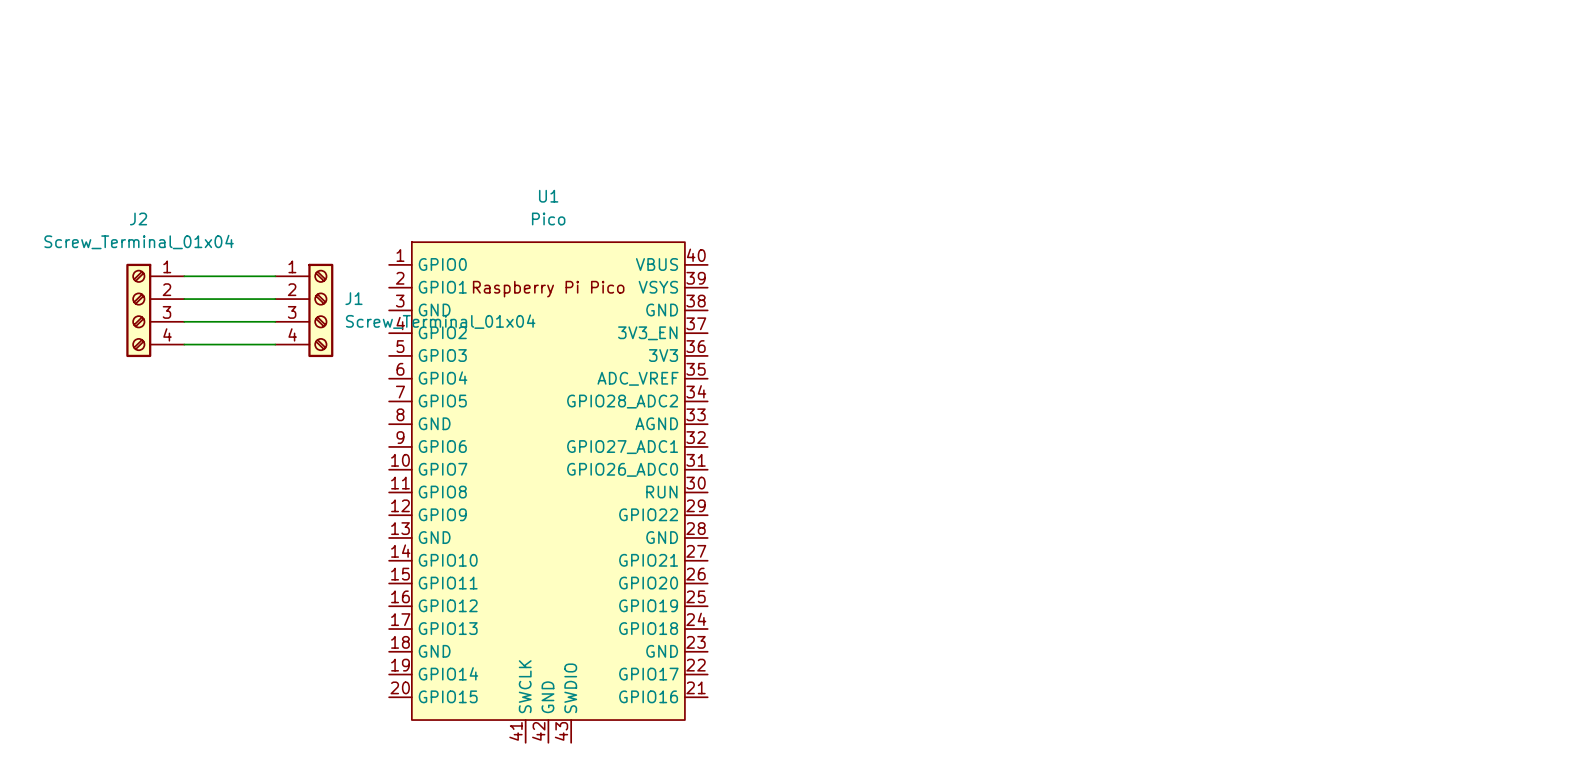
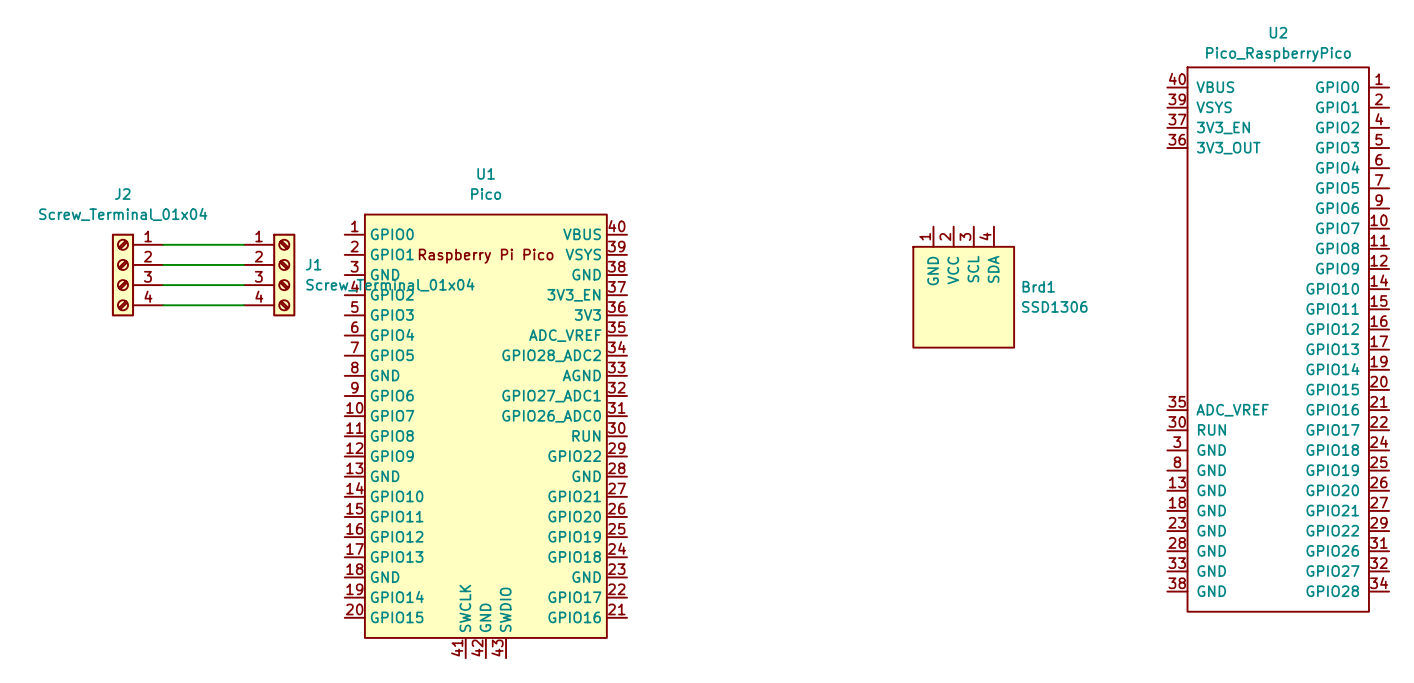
Brd1: none -> SSD1306 (963, 287)
U2: none -> Pico_RaspberryPico (1278, 339)

